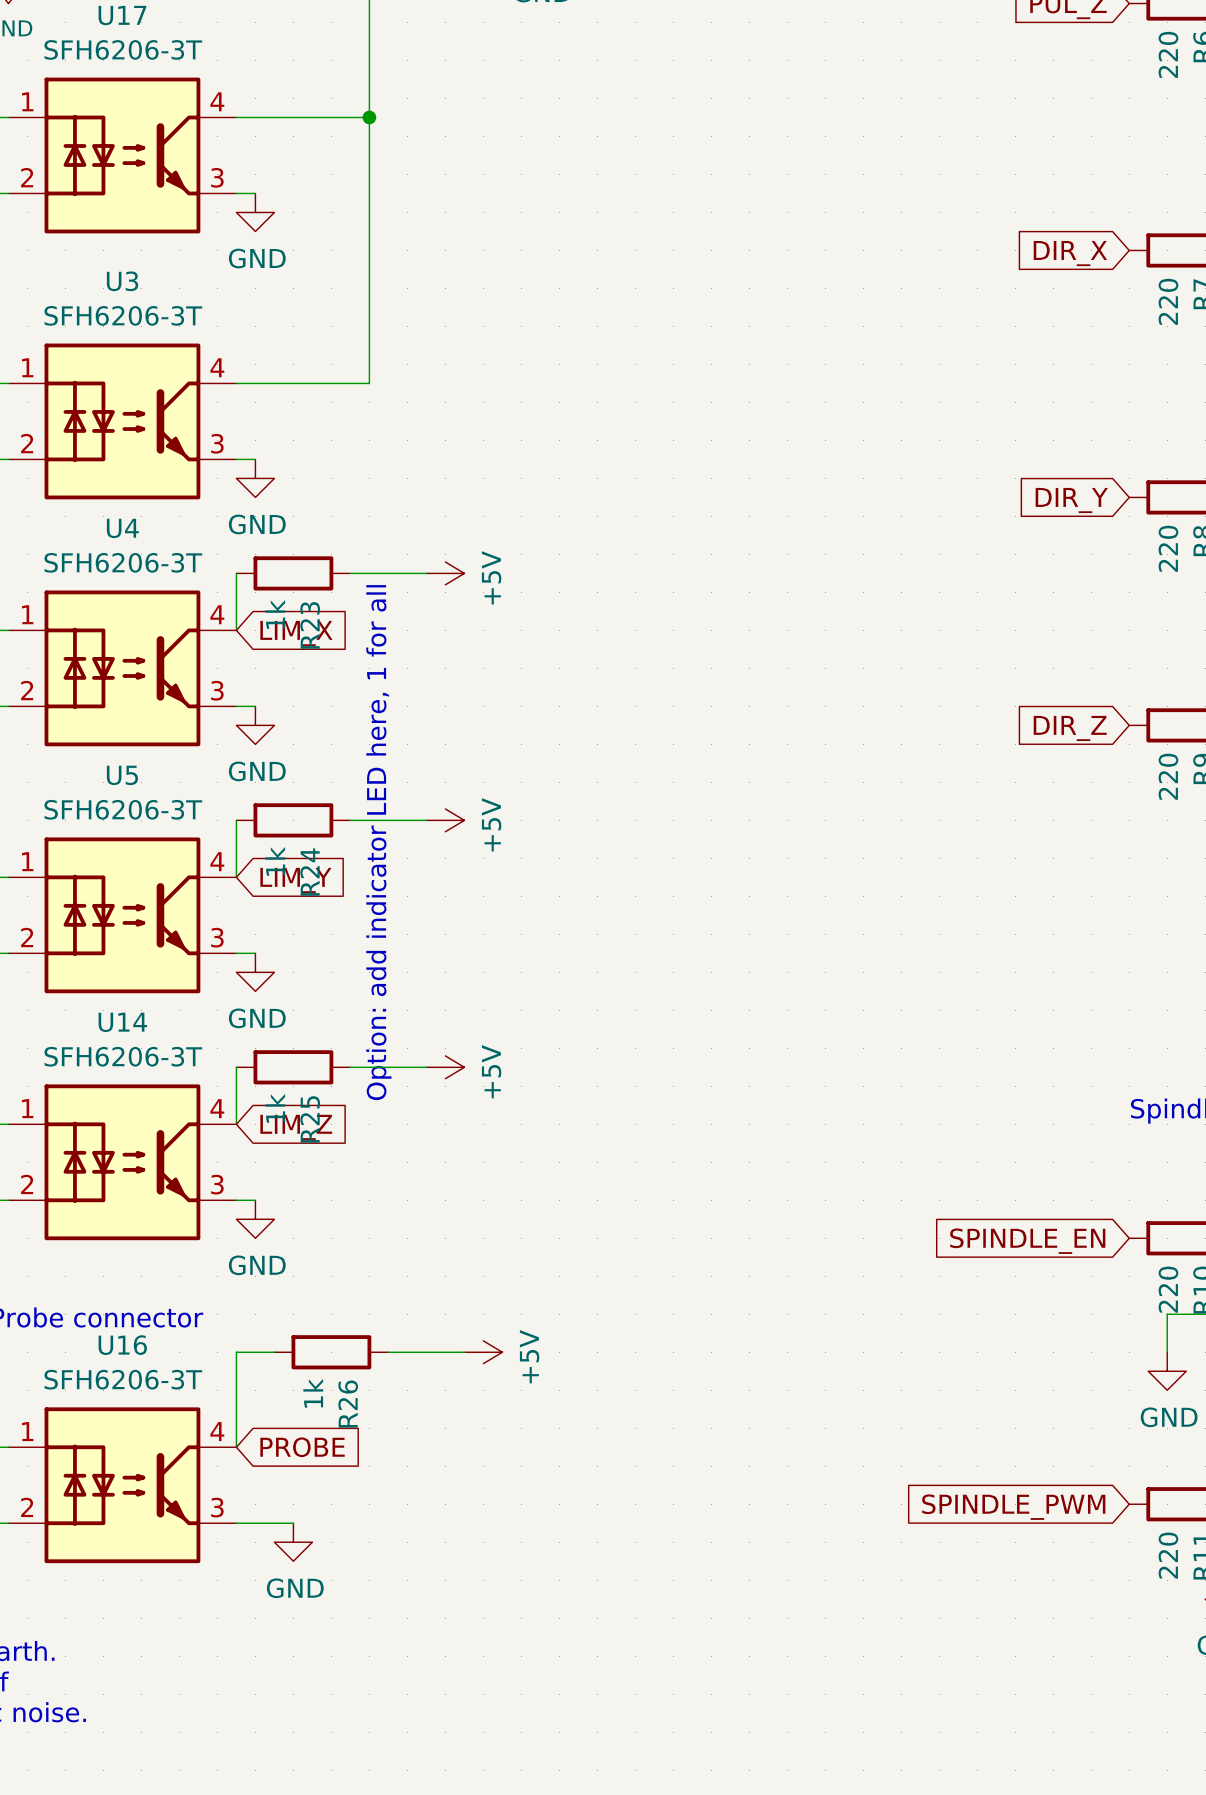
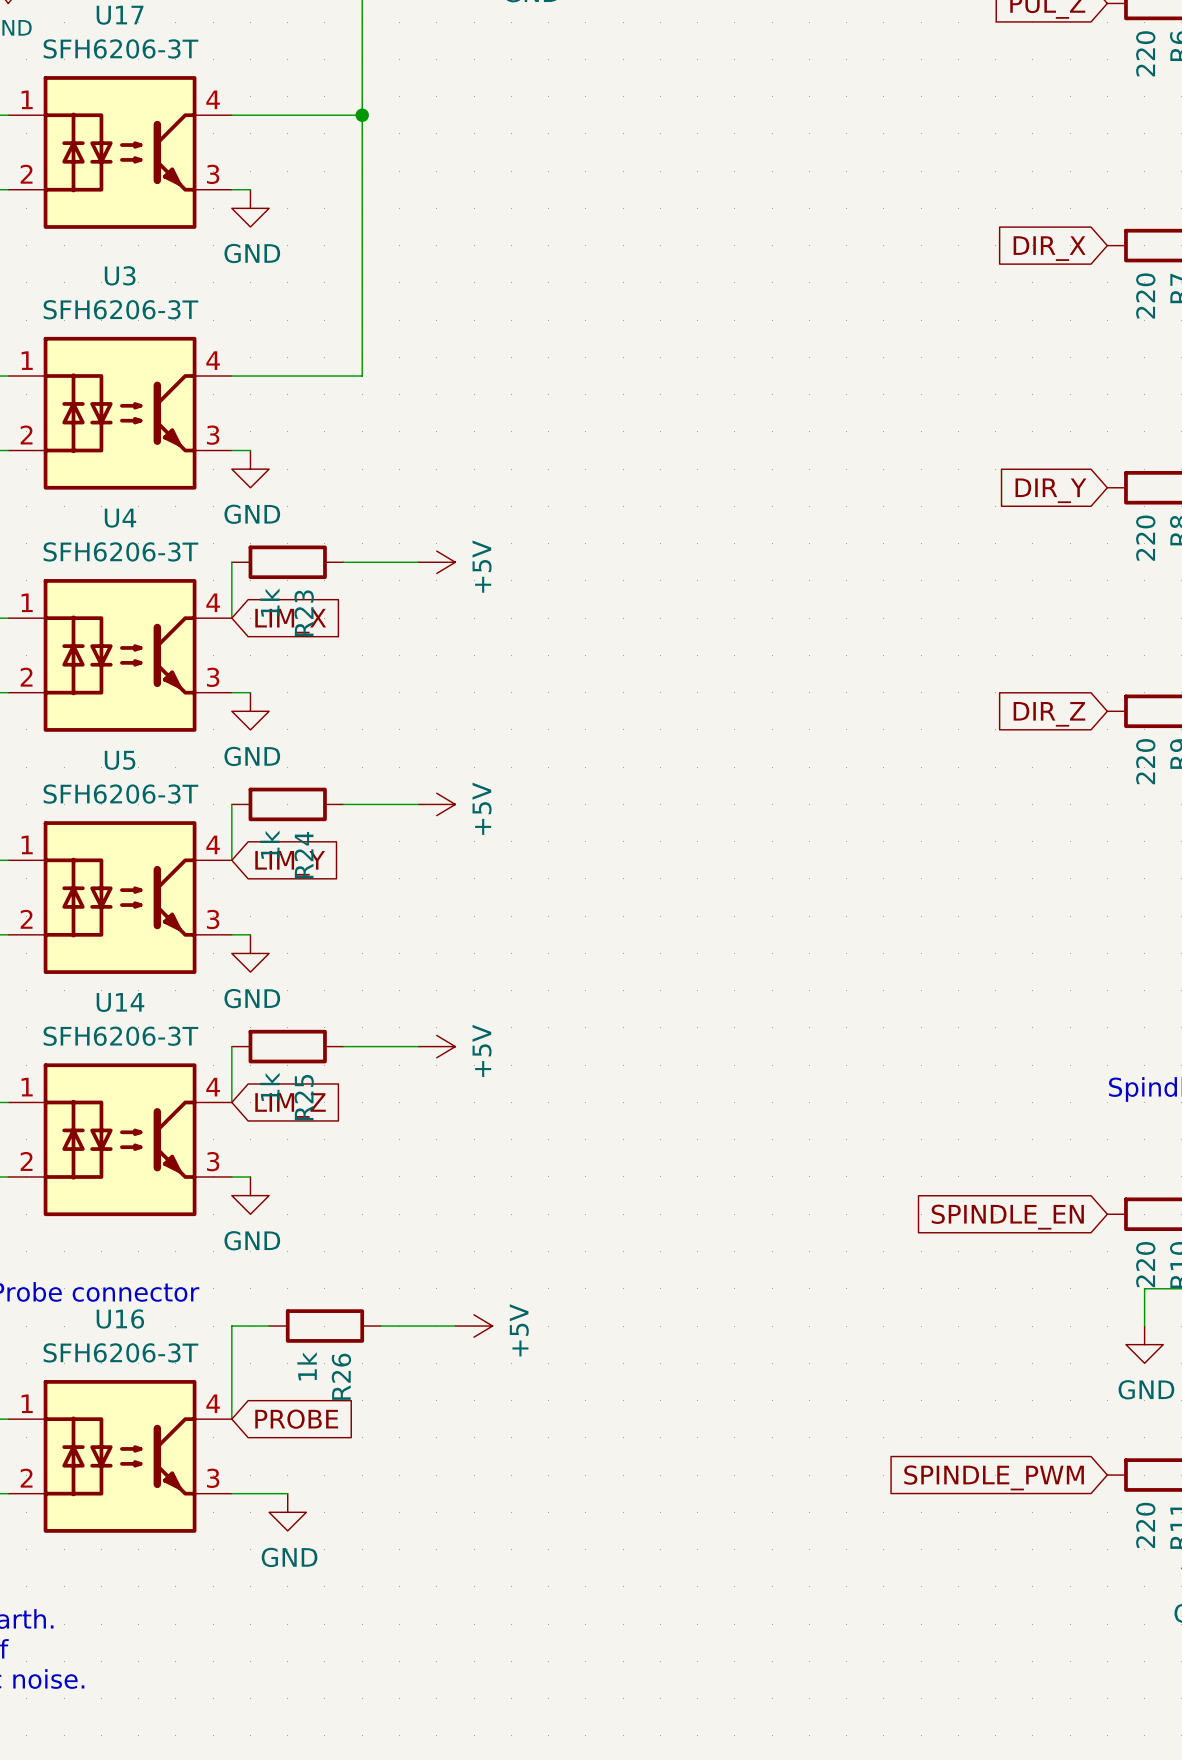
text: Option: add indicator LED here, 1 for all (378, 842) -> none

